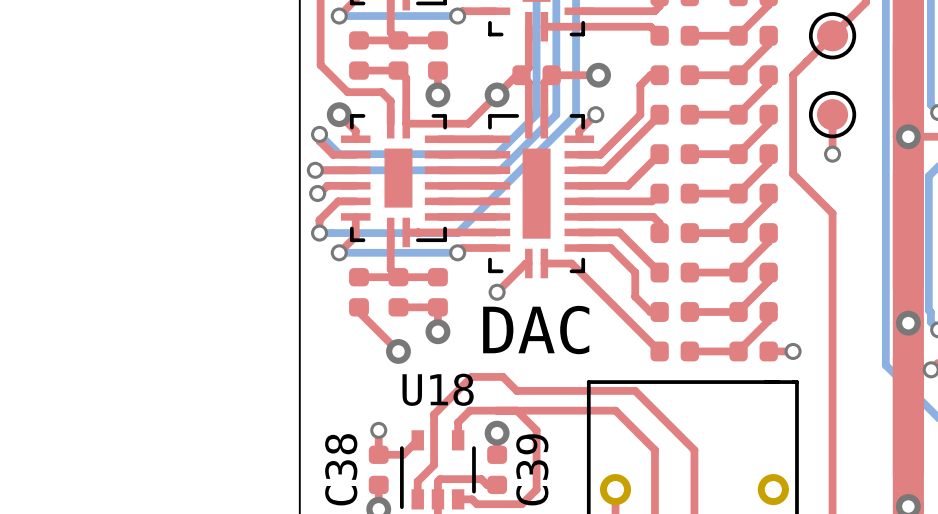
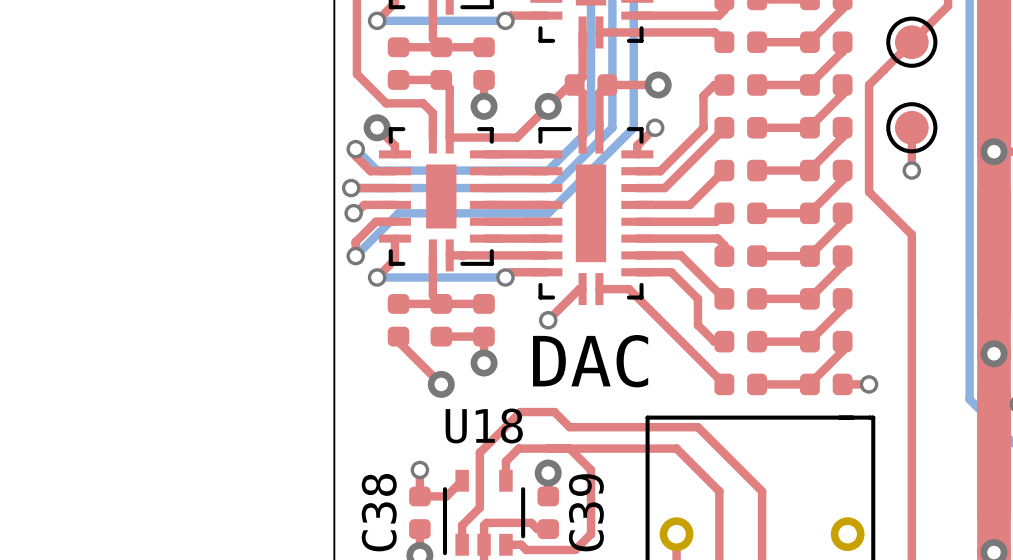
bottom track: (497, 193) (457, 233) (319, 233) -> (548, 213) (398, 213) (355, 256)

